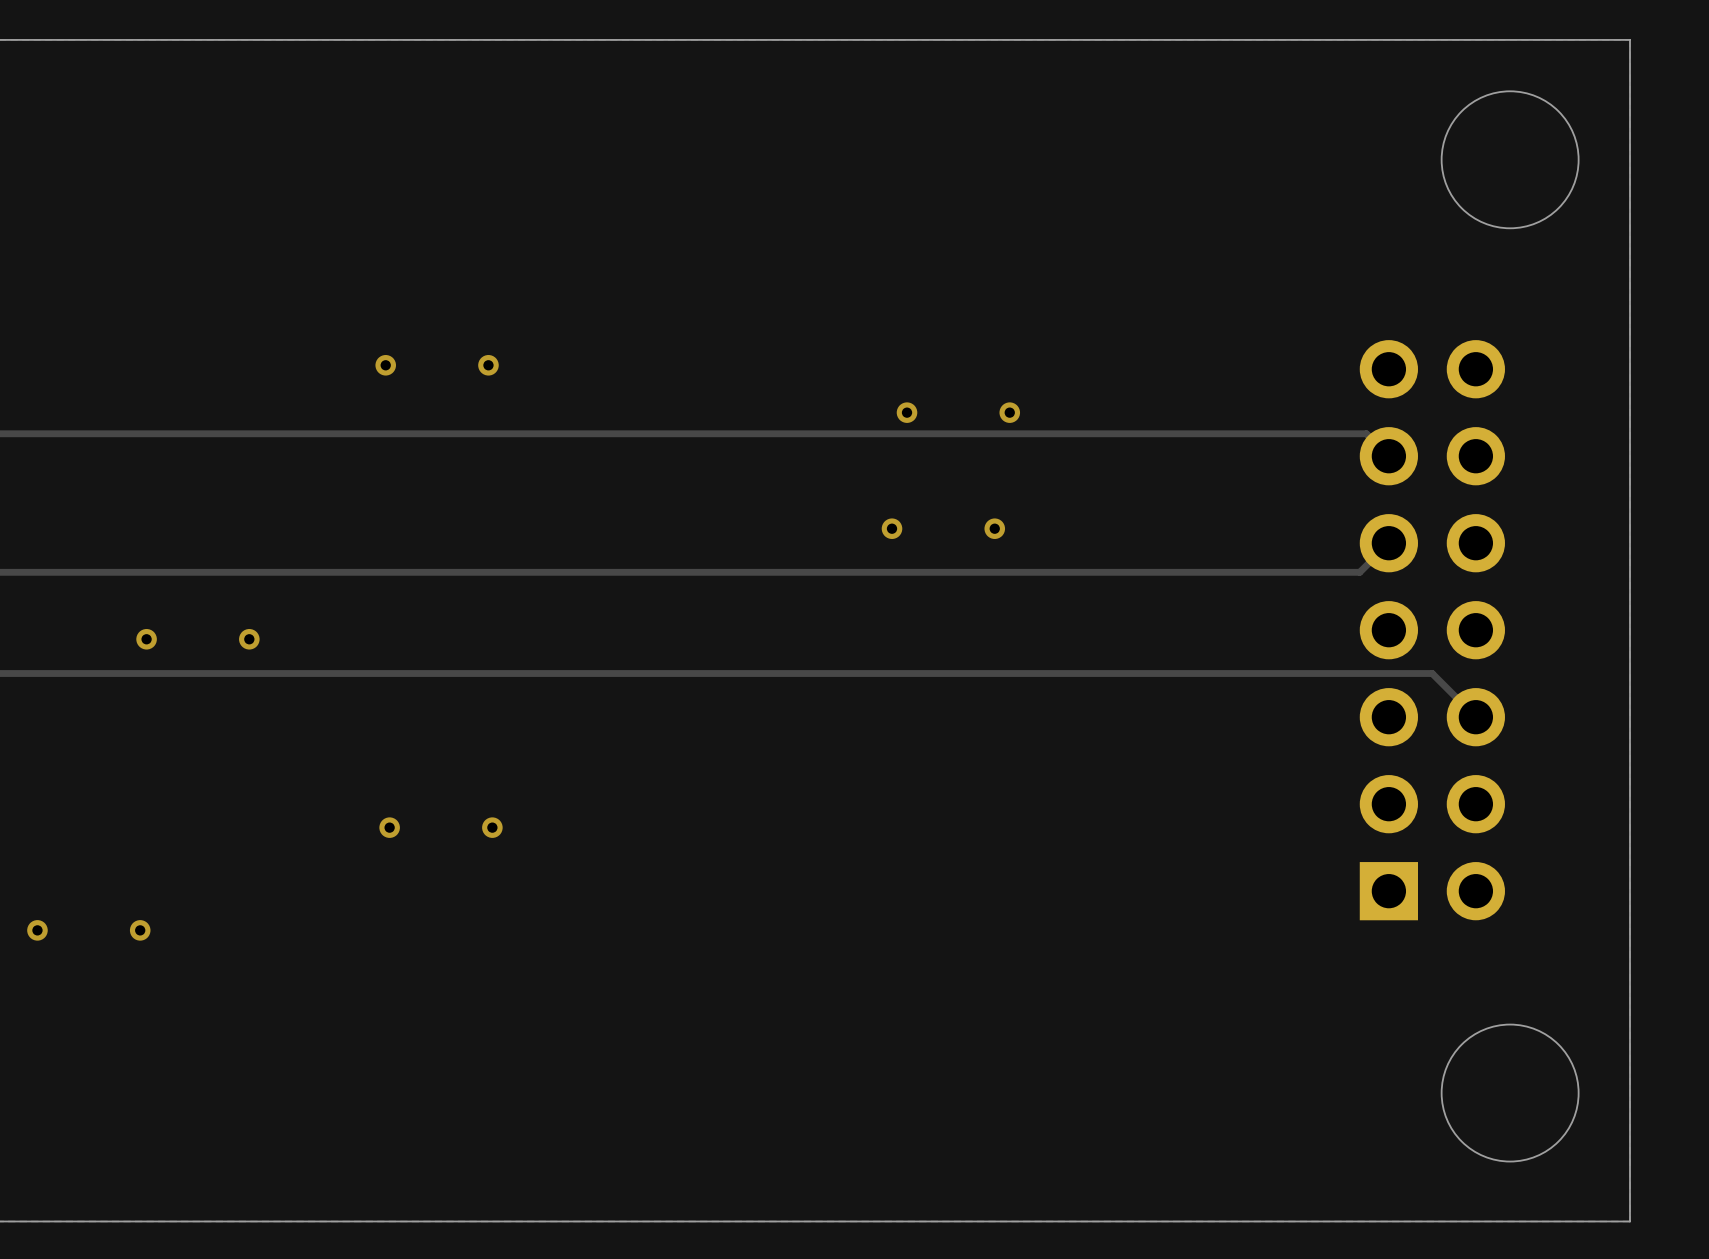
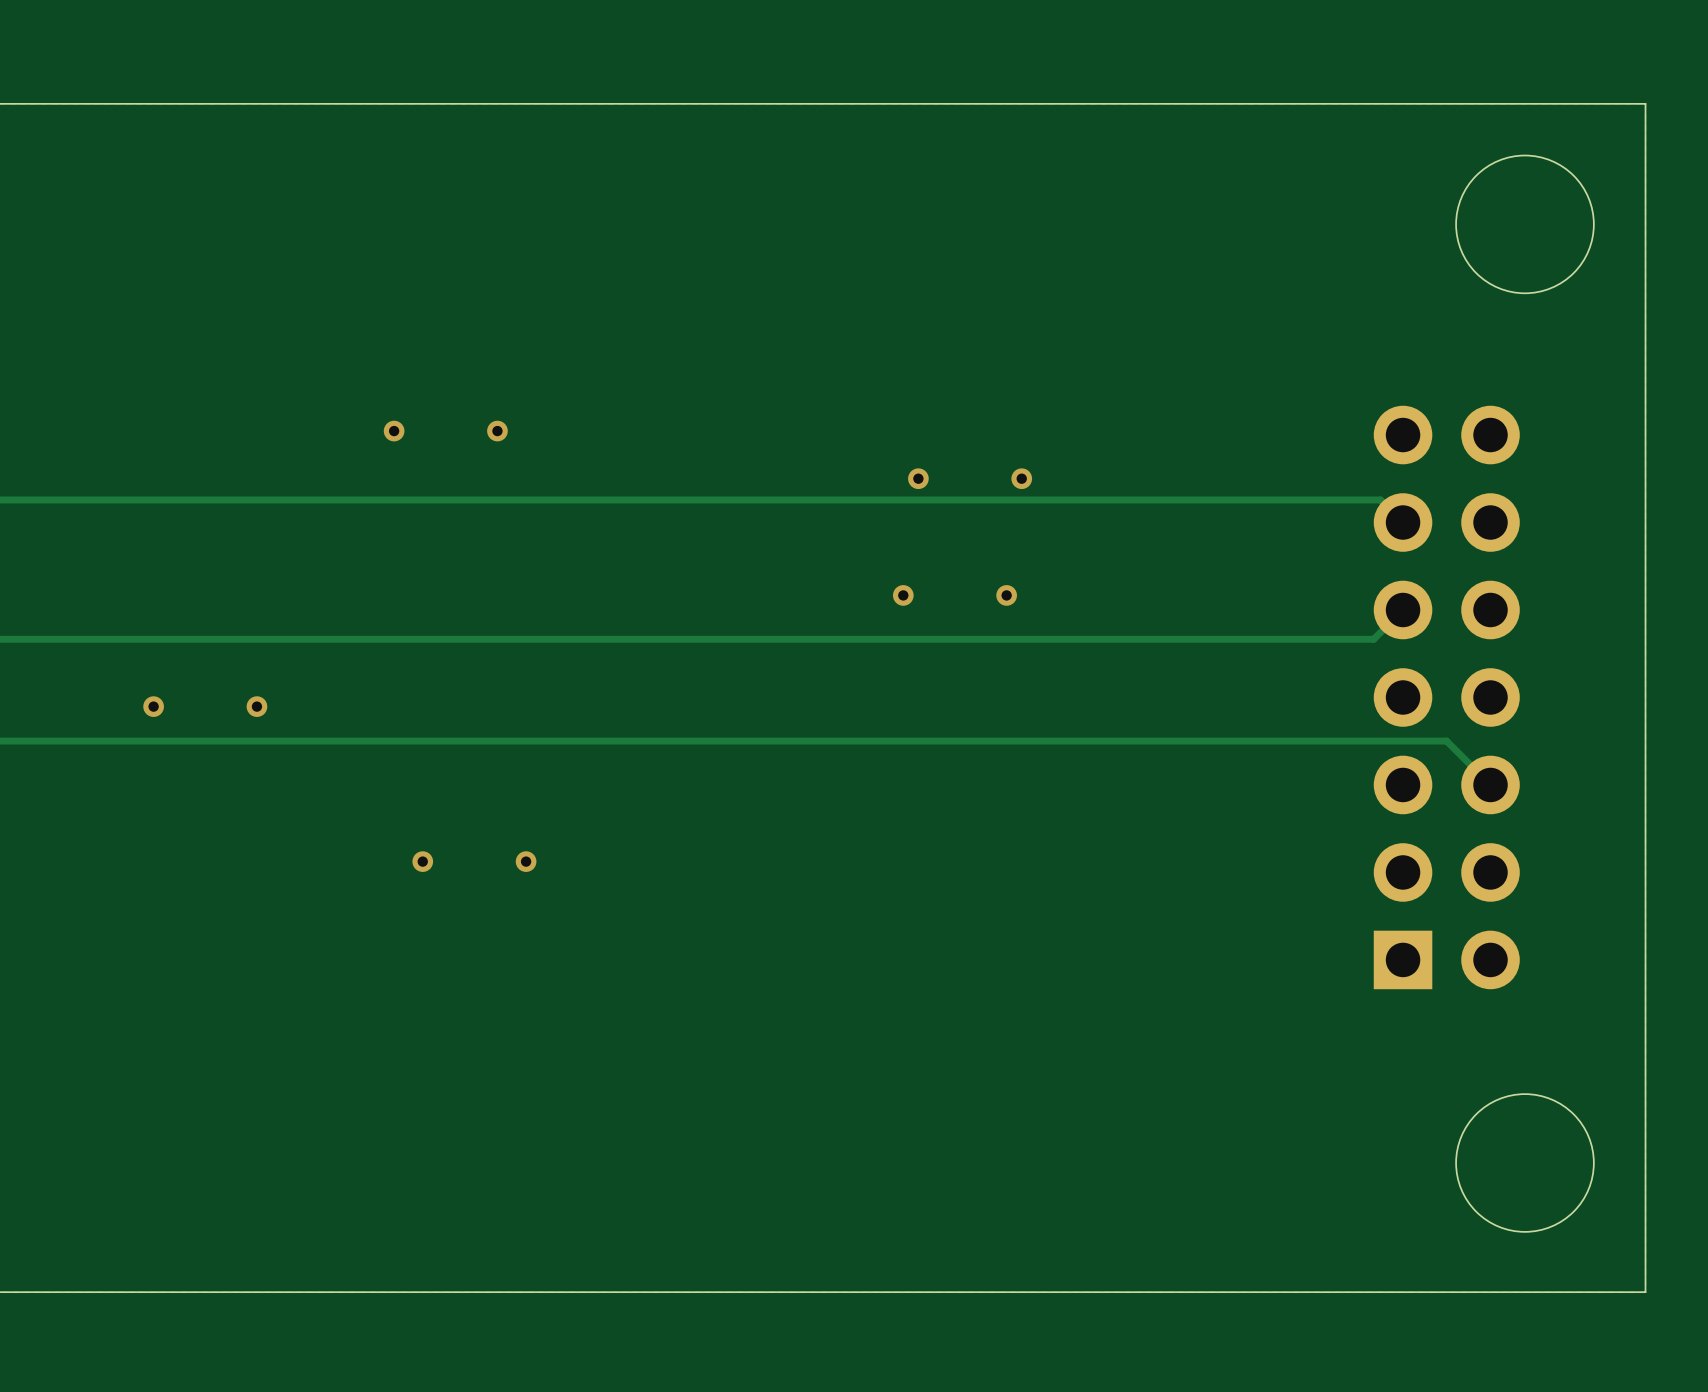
via position: (389, 827) -> (422, 861)
via position: (492, 827) -> (526, 861)
via: (37, 930) -> none
via: (140, 930) -> none

